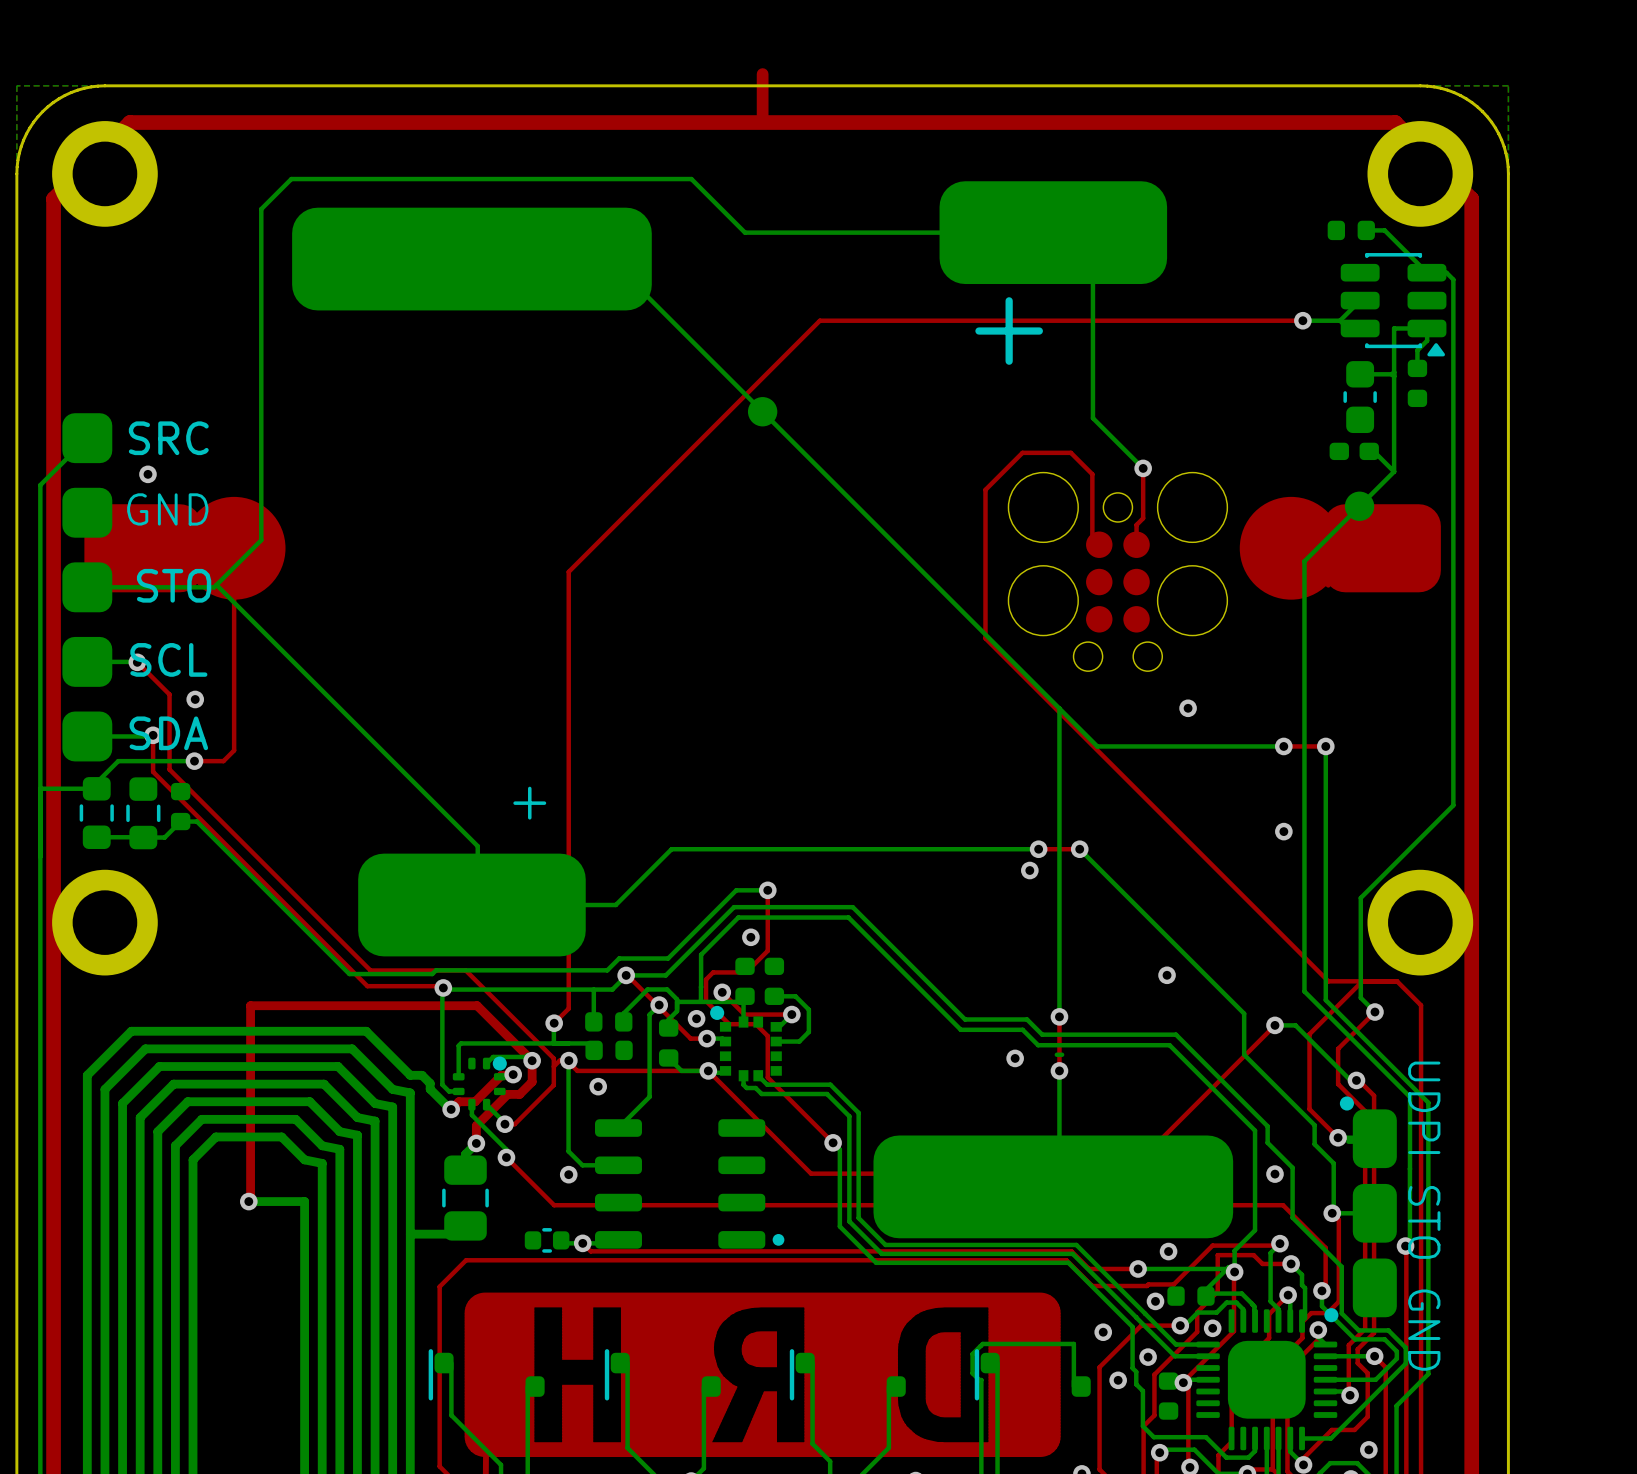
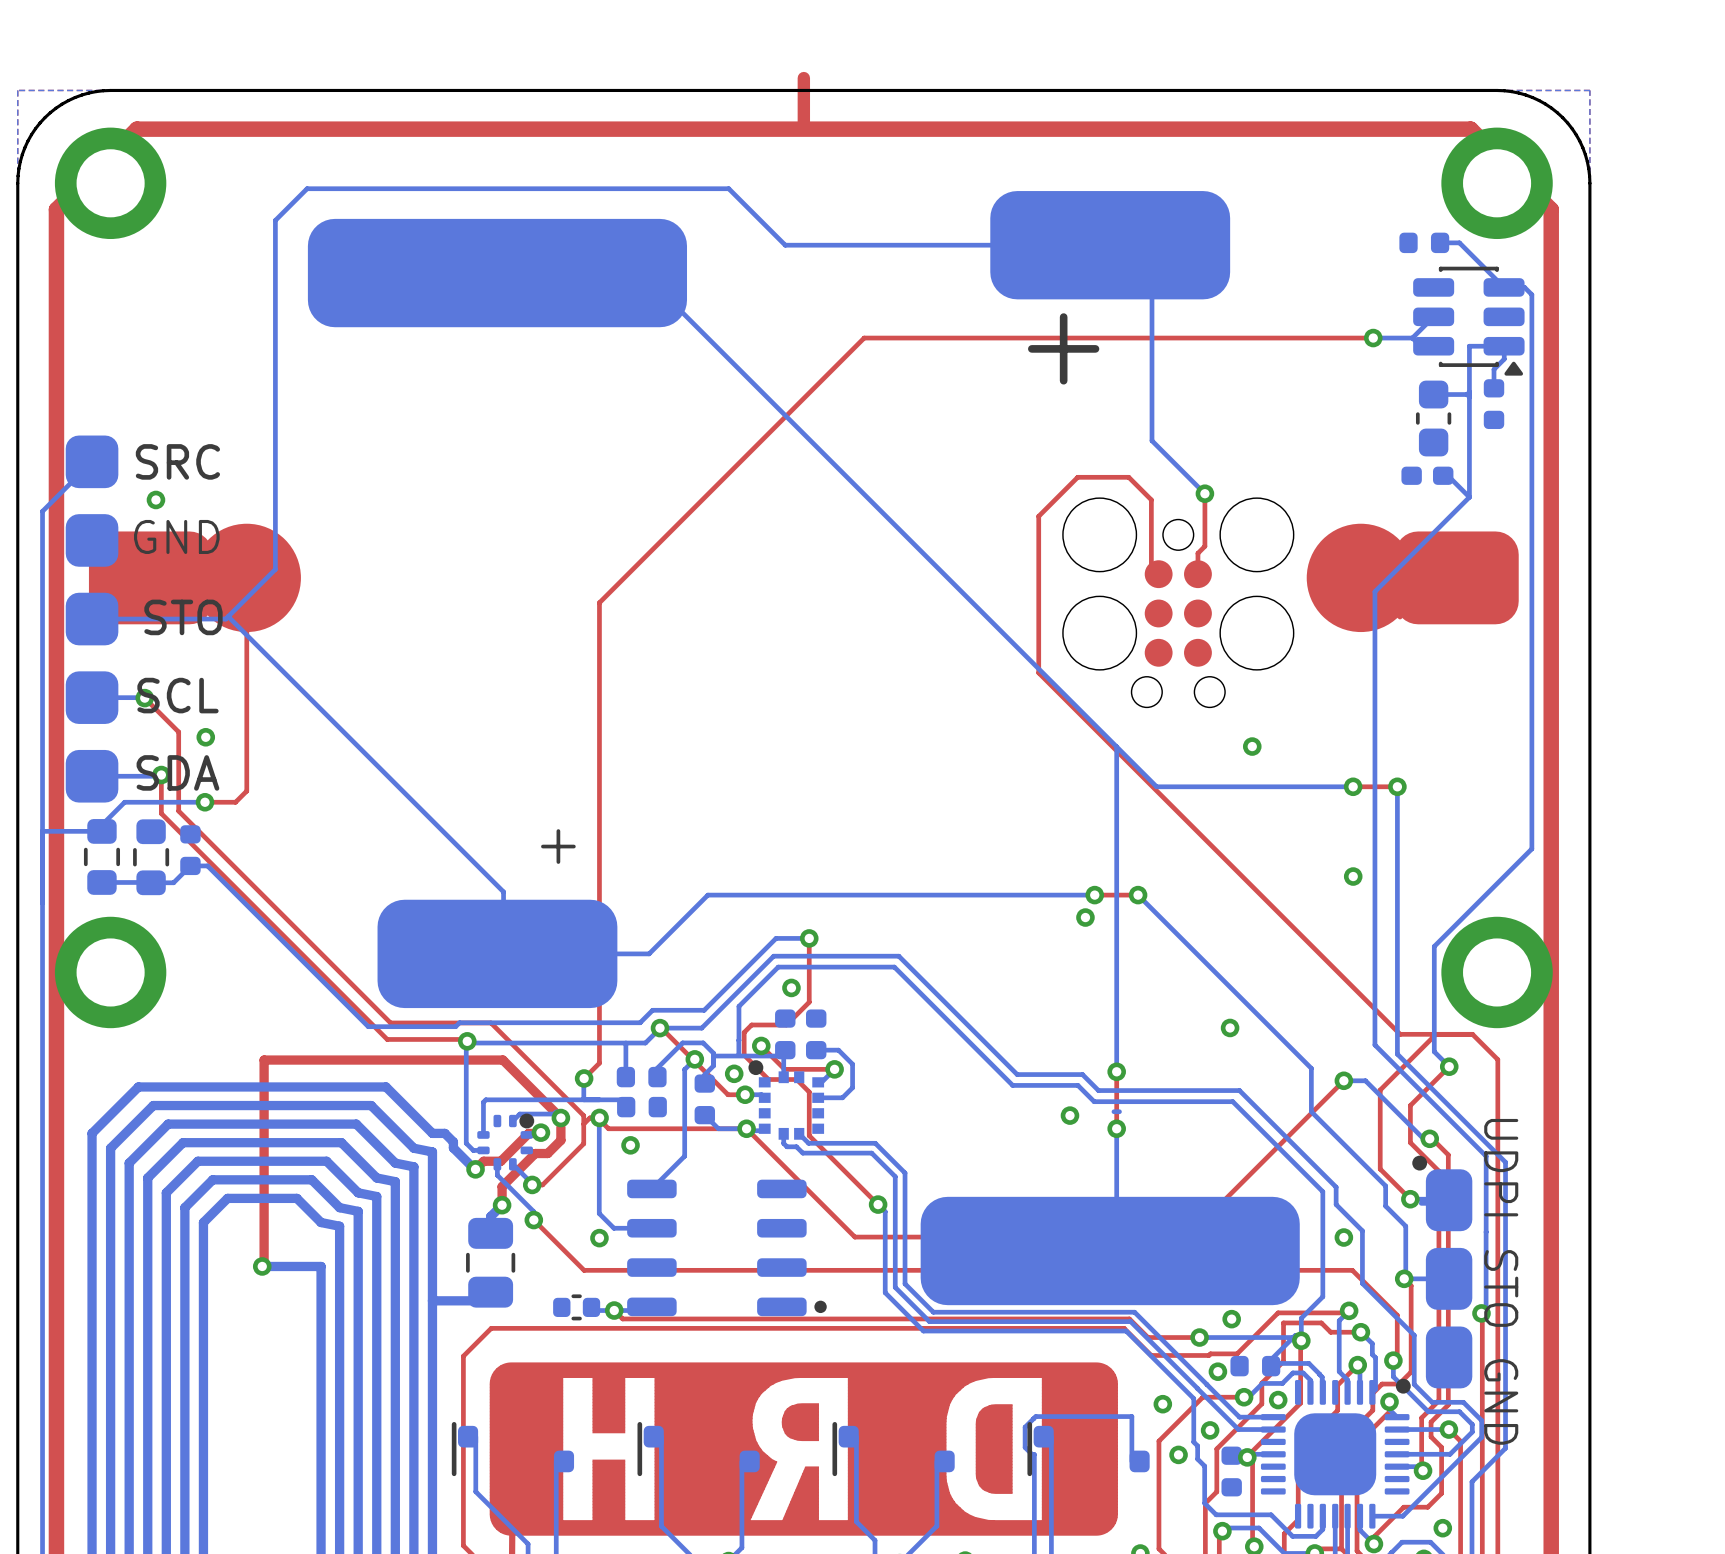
part: (762, 411) -> none
part: (1359, 506) -> none

